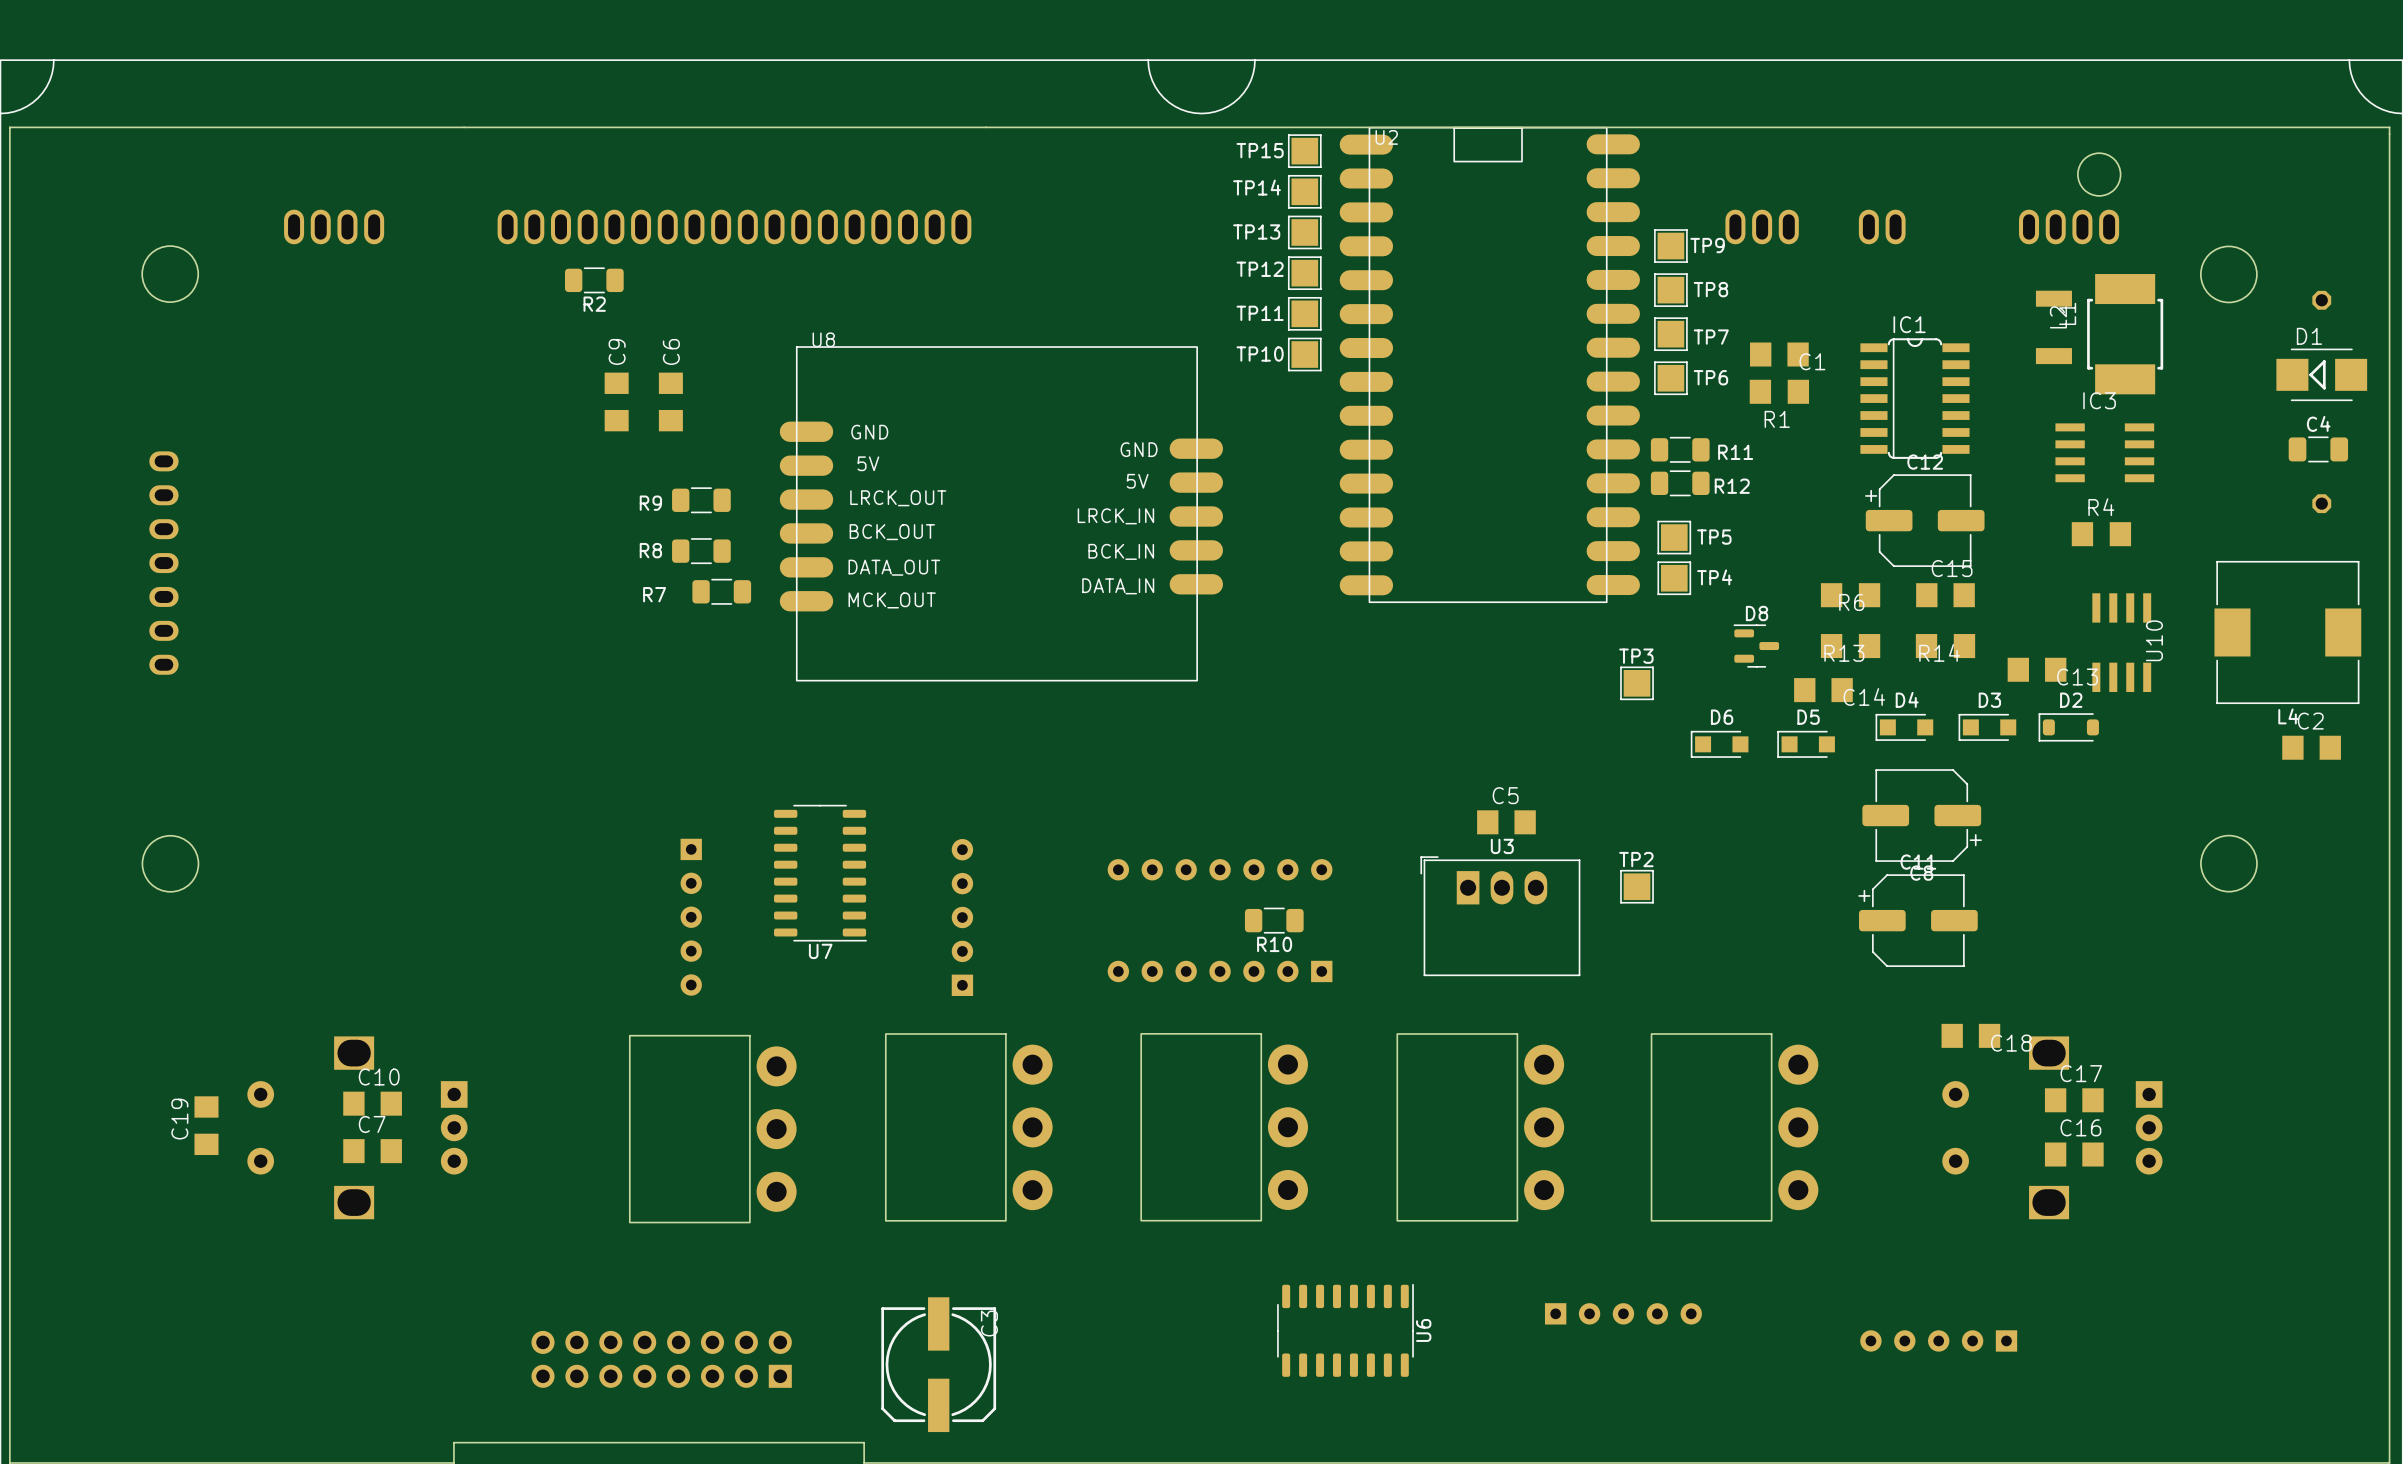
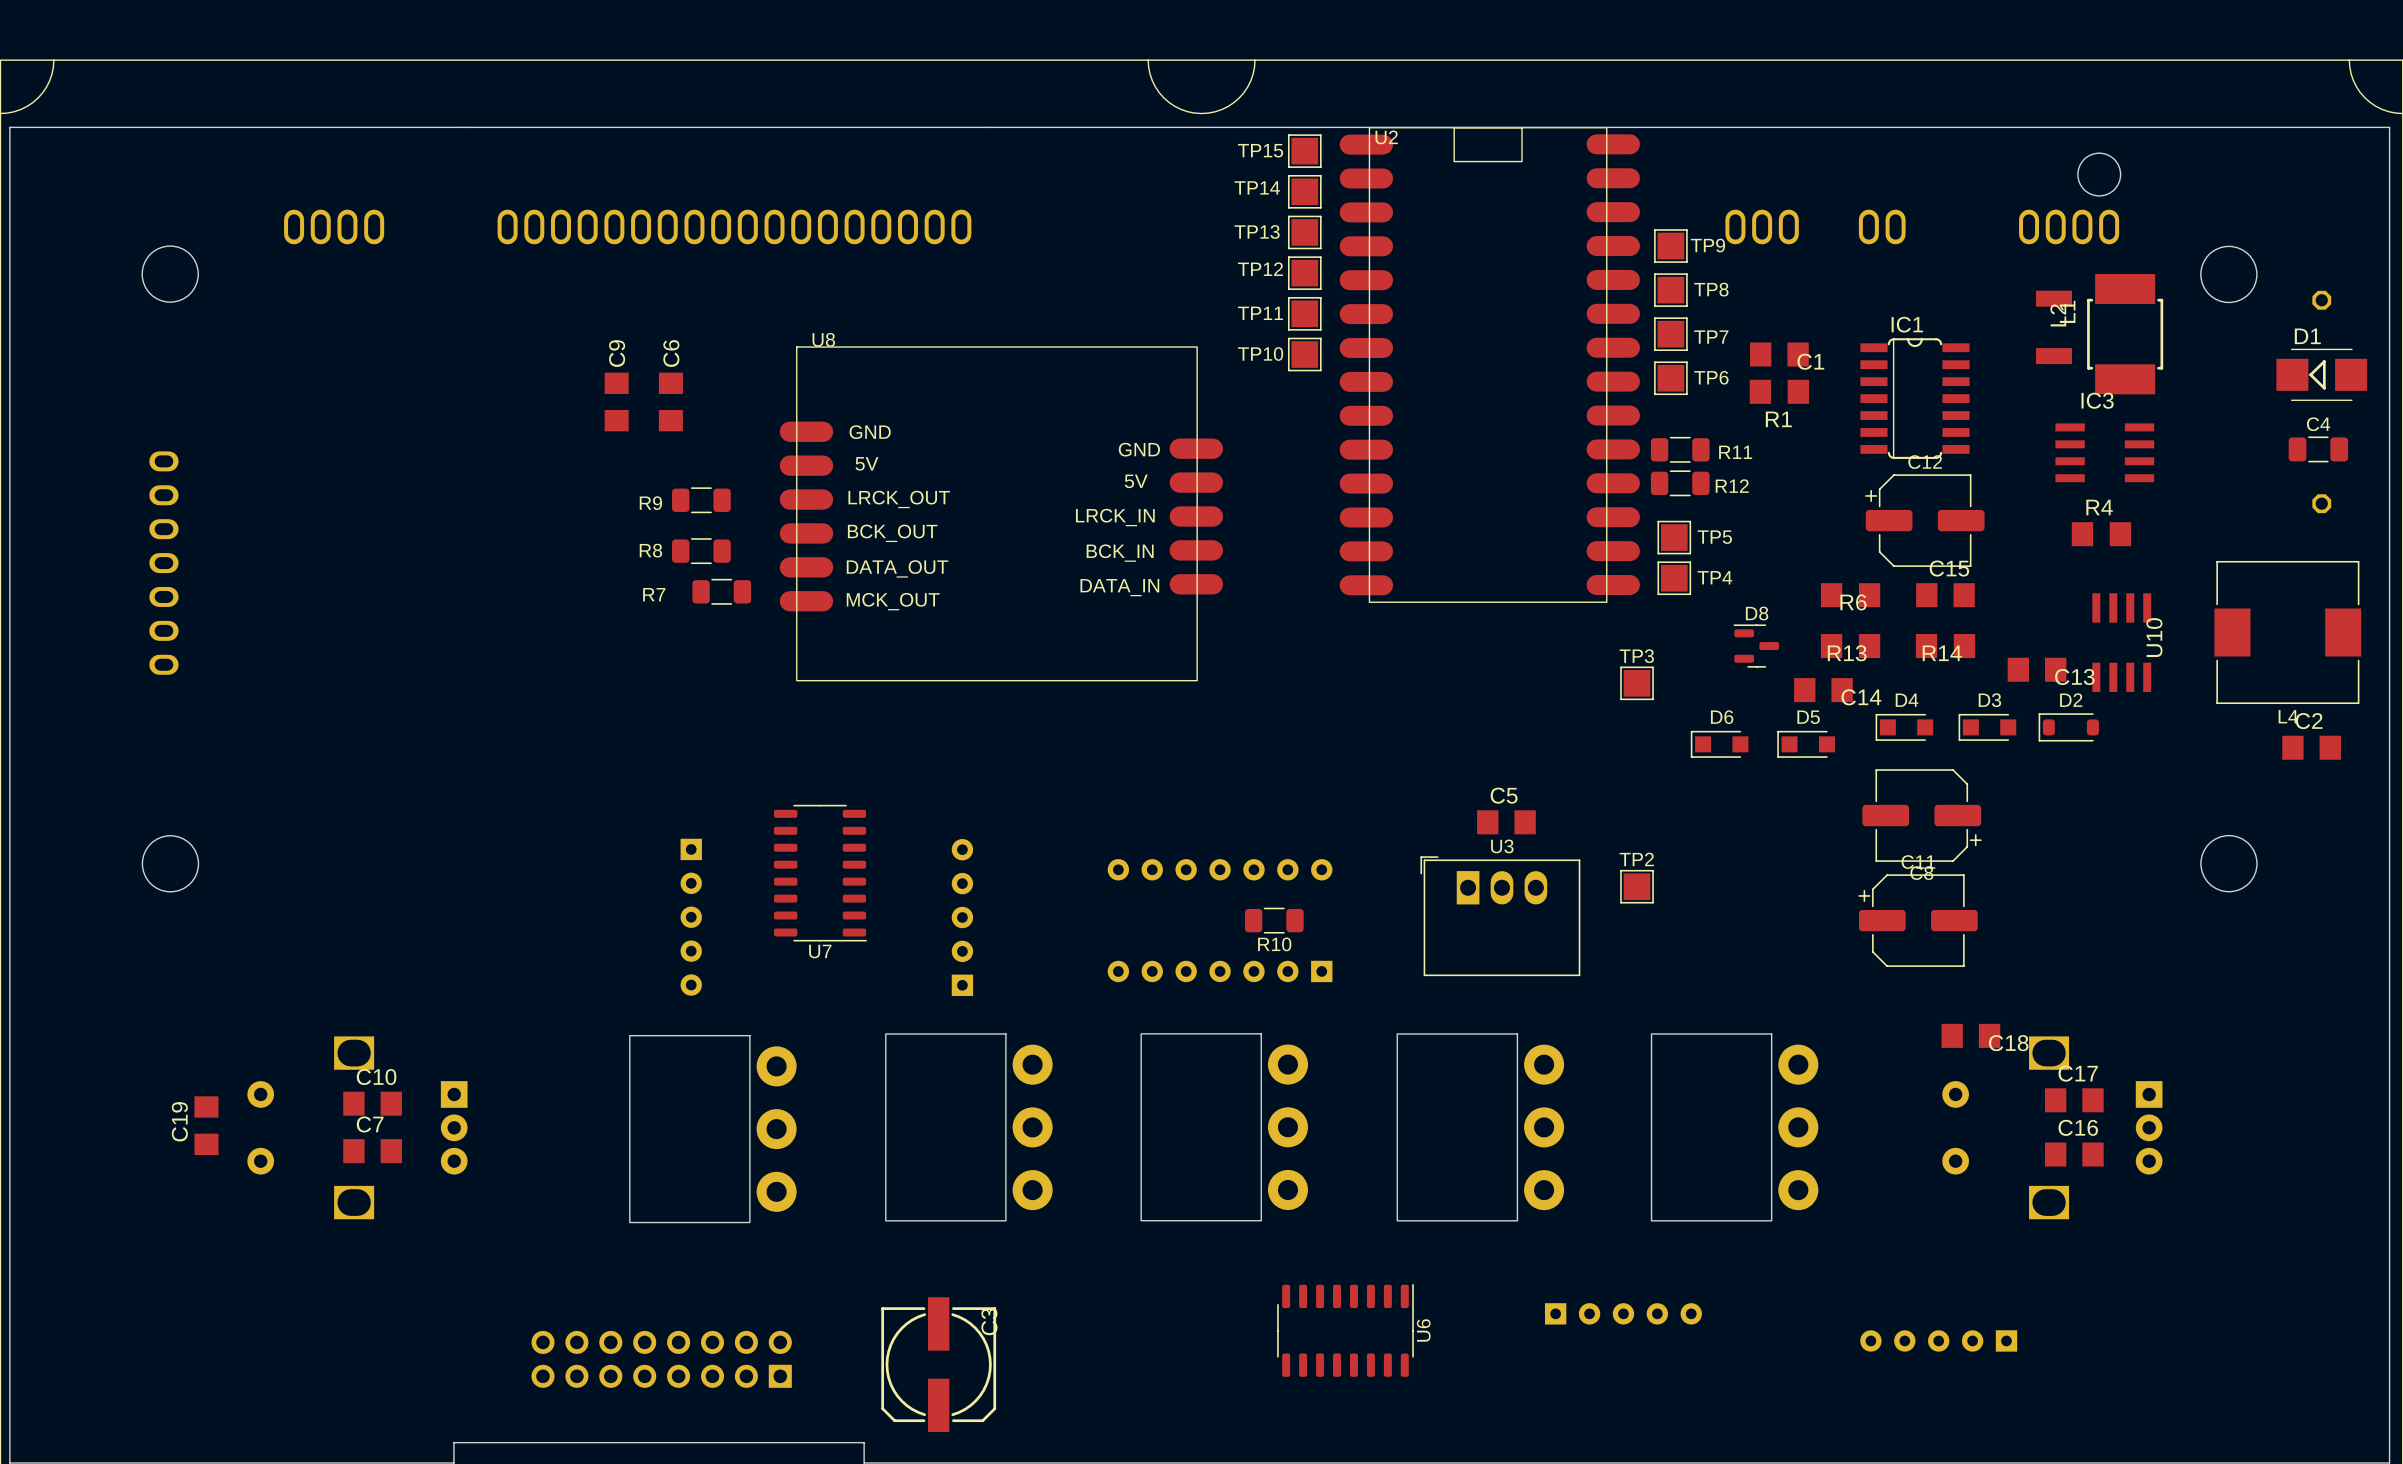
R2: (594, 280) -> none

